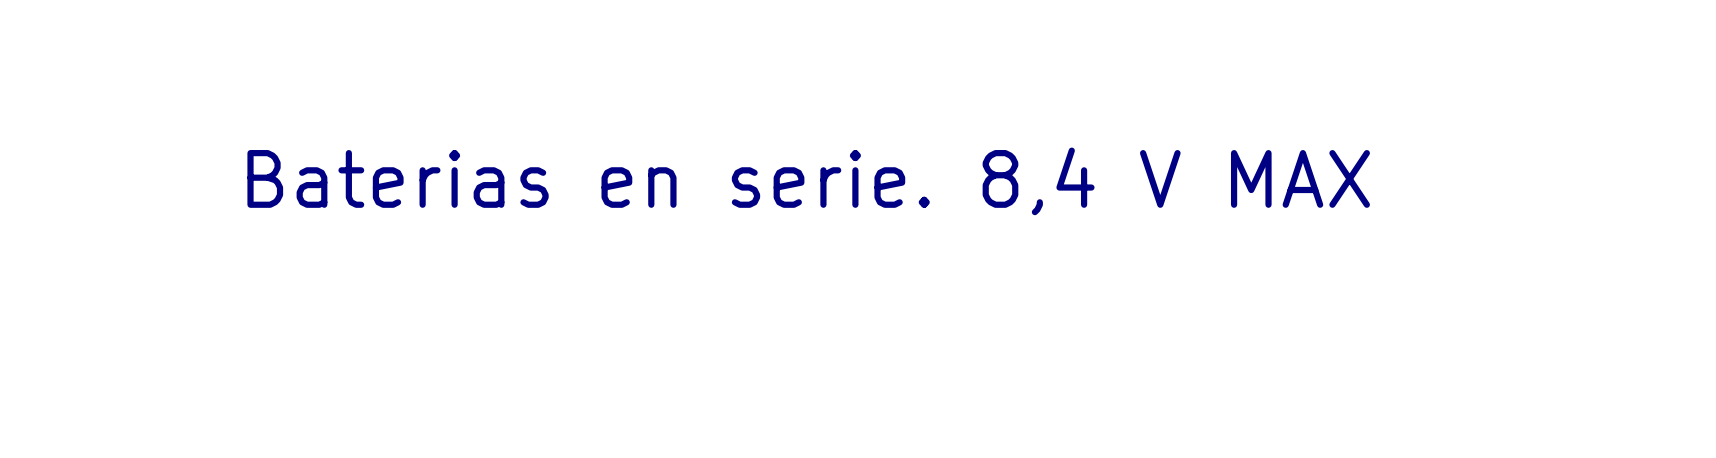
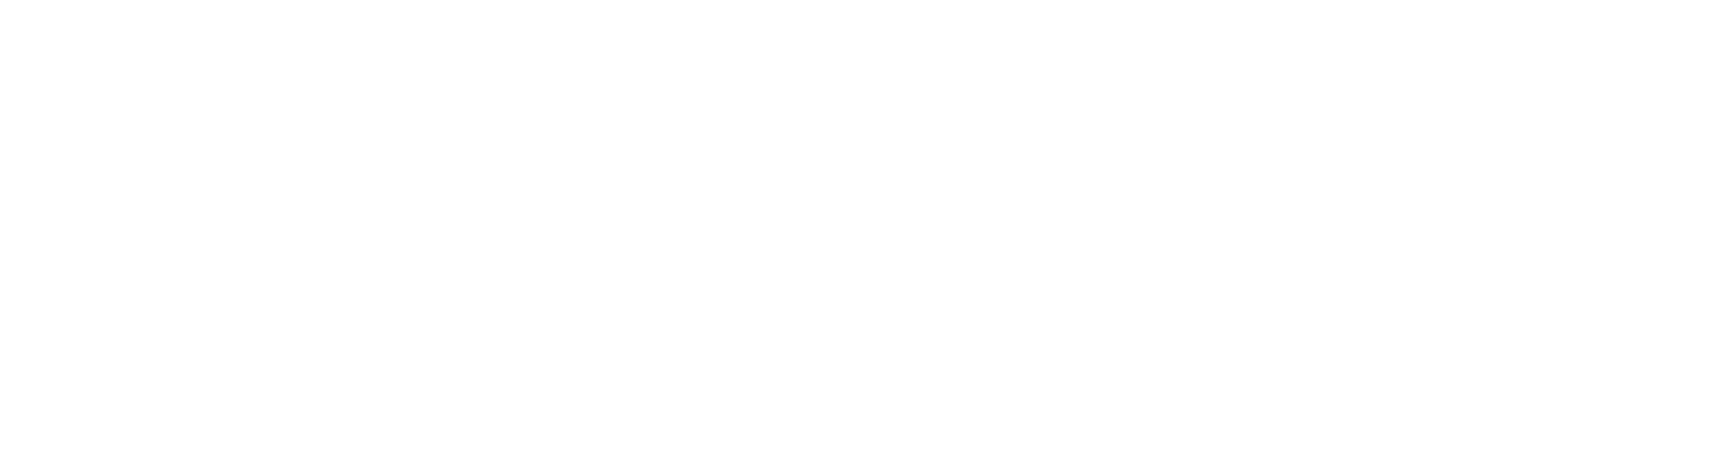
text: Baterias en serie. 8,4 V MAX (808, 181) -> none

